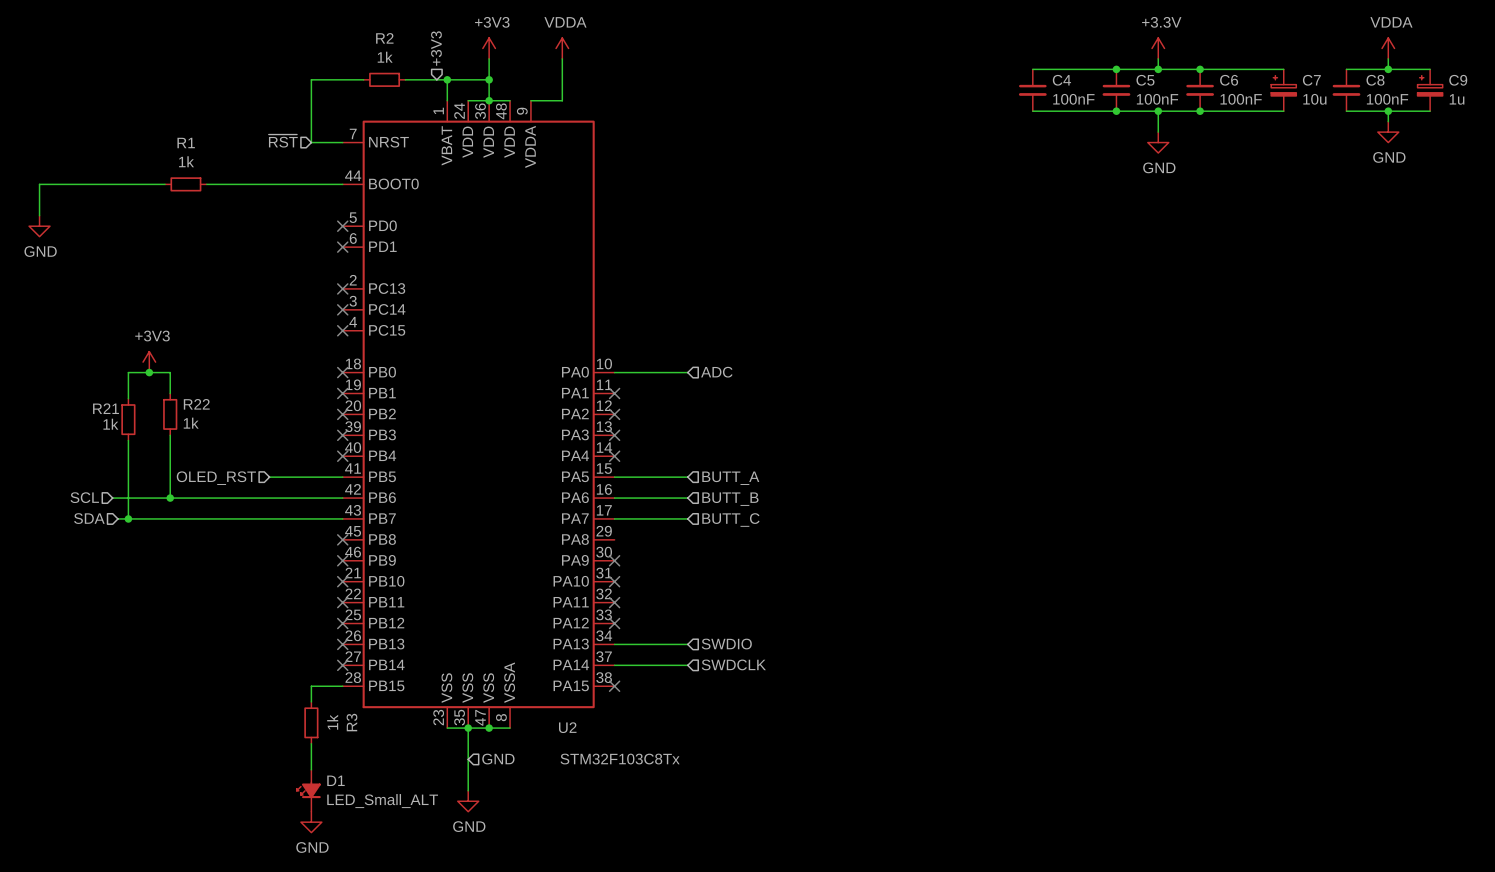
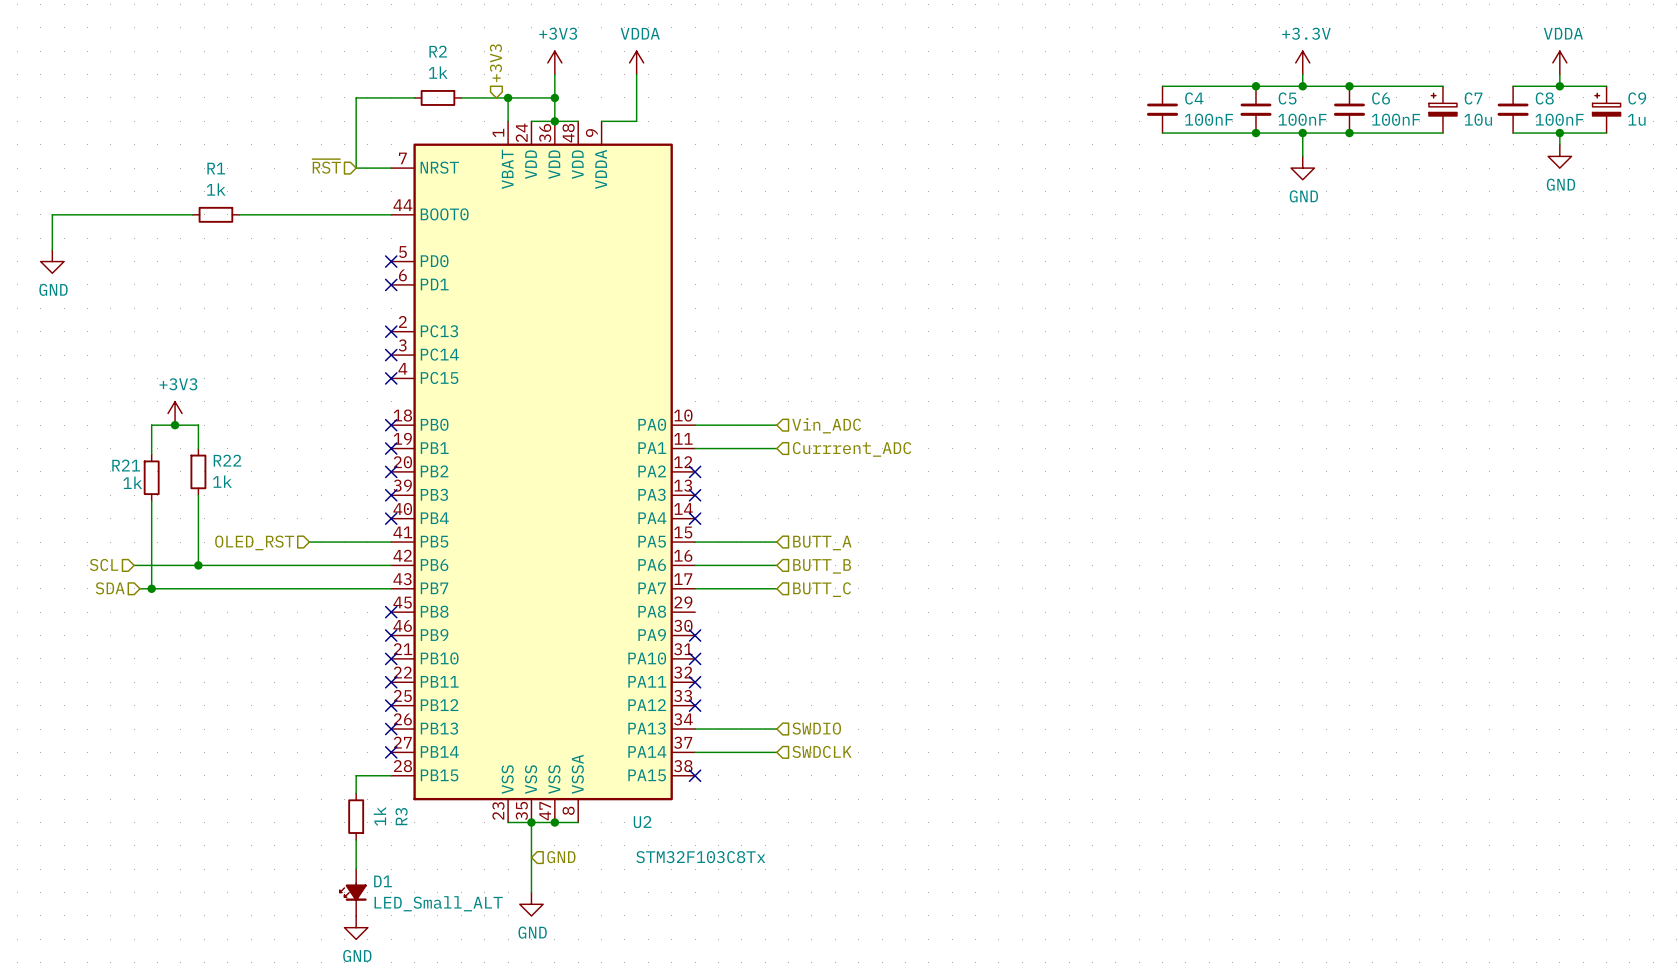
hierarchical label: ADC (716, 372) -> Vin_ADC (826, 425)
wire: none -> (695, 448) (776, 448)
no-connect mark: (614, 393) -> none
hierarchical label: none -> Currrent_ADC (852, 449)

